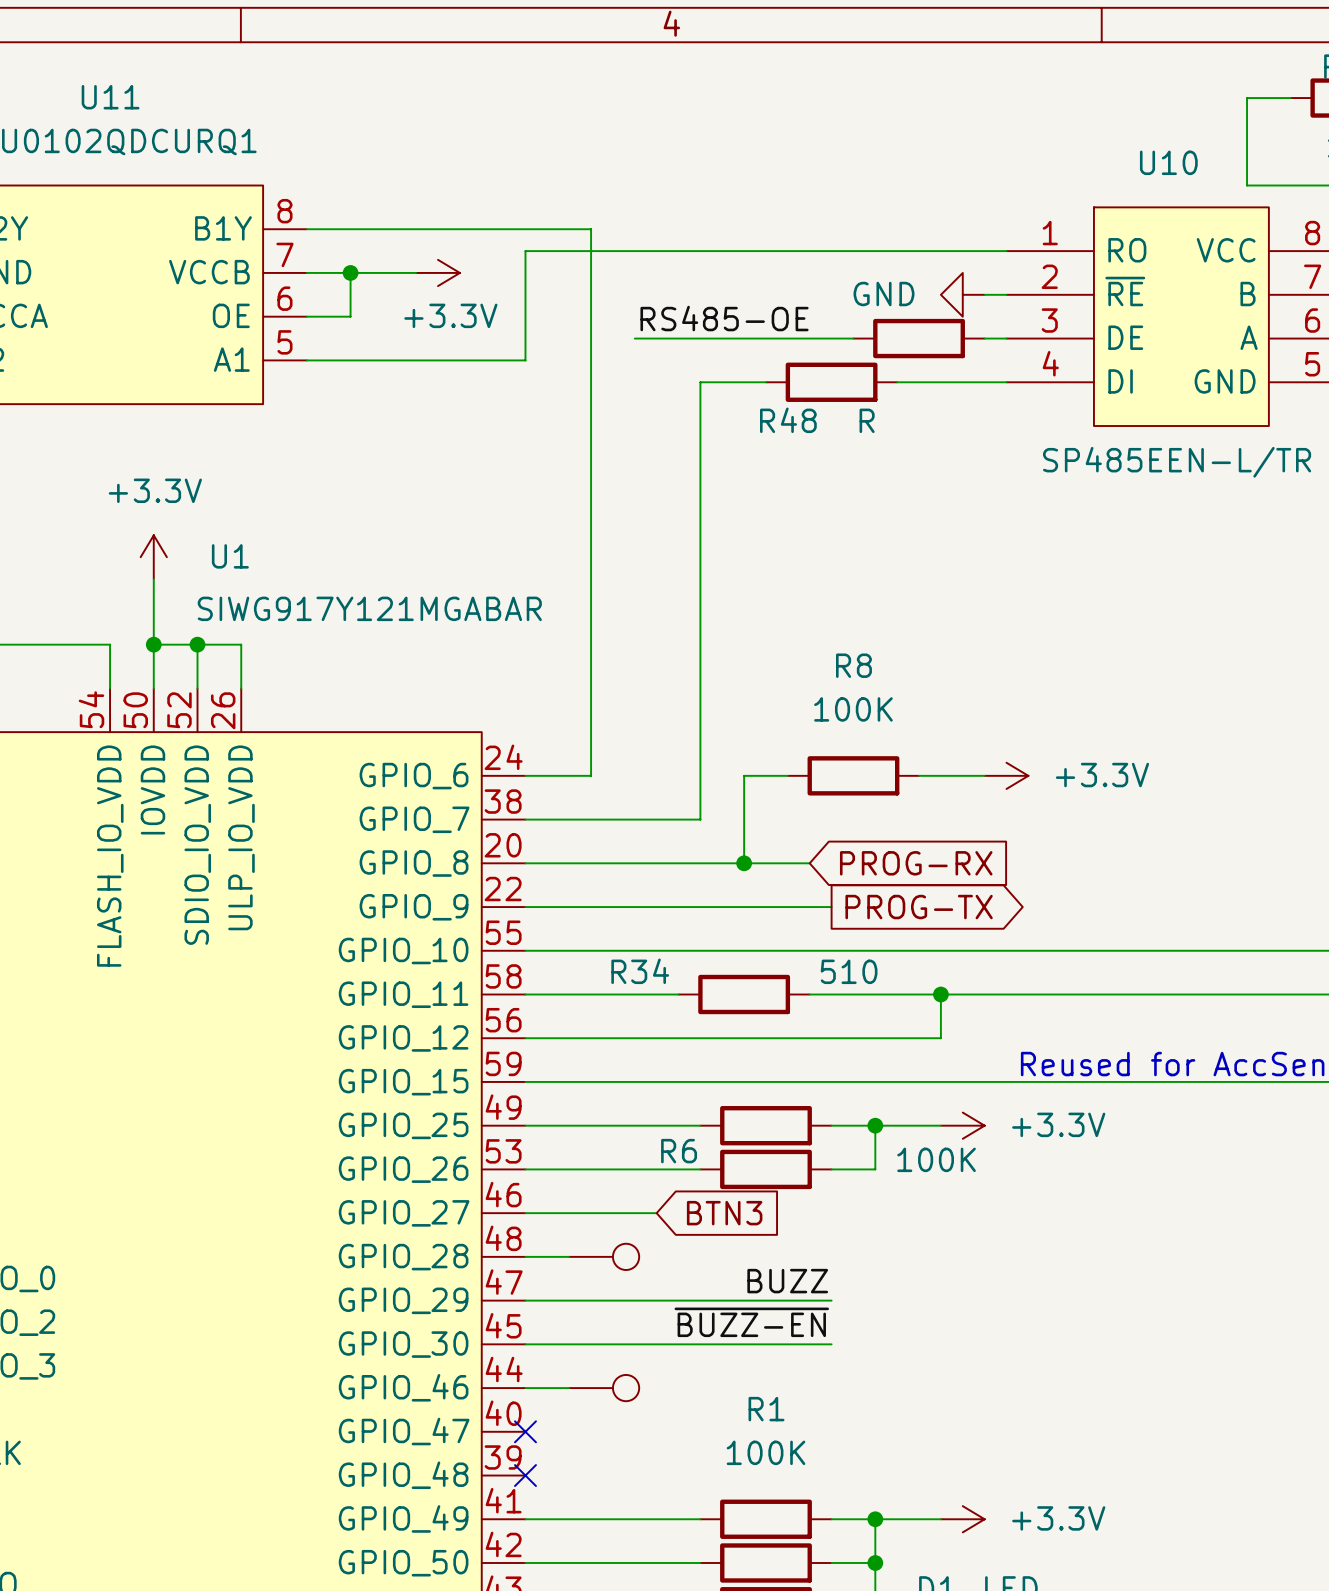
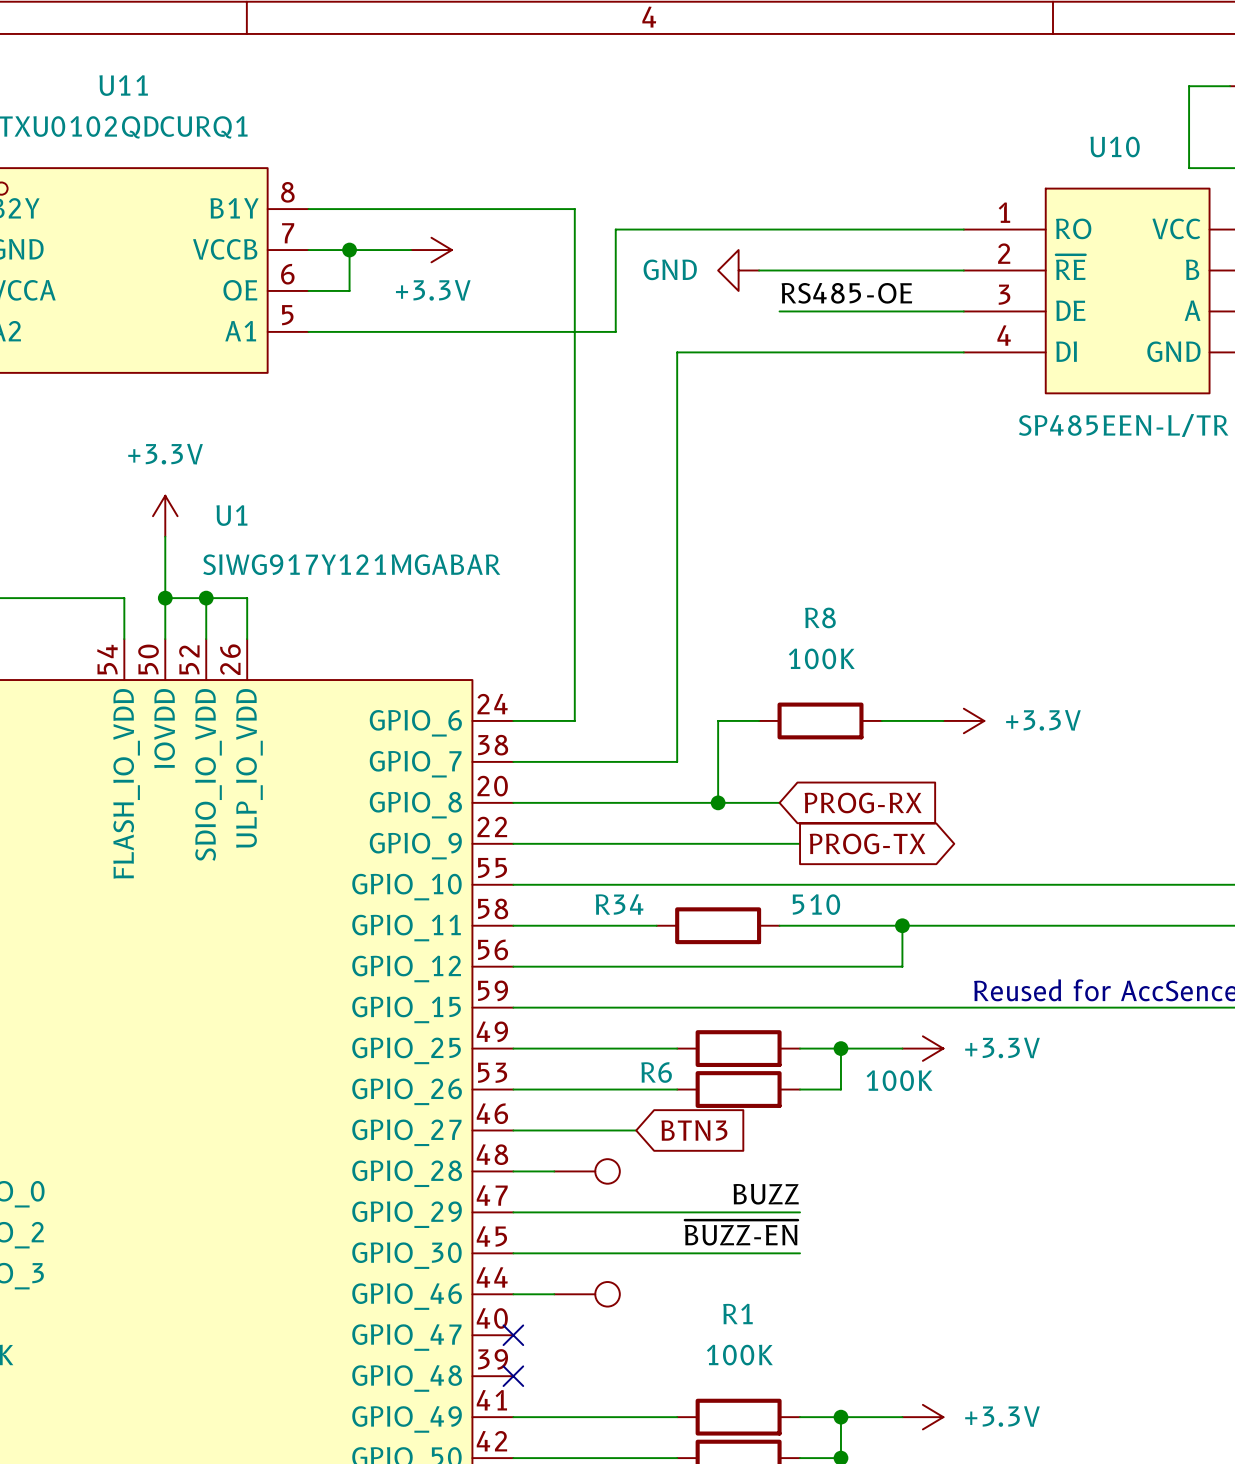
wire: (634, 251) (525, 251) (525, 360) -> (615, 229) (615, 331) (513, 331)
wire: none -> (759, 270) (943, 270)
power symbol position: GND (962, 294) -> GND (738, 270)
label position: RS485-OE (724, 318) -> RS485-OE (846, 293)
wire: (634, 338) (809, 338) -> none
wire: none -> (820, 311) (943, 311)
part: (919, 338) -> none
wire: none -> (738, 352) (861, 352)
R48: R (831, 382) -> none

